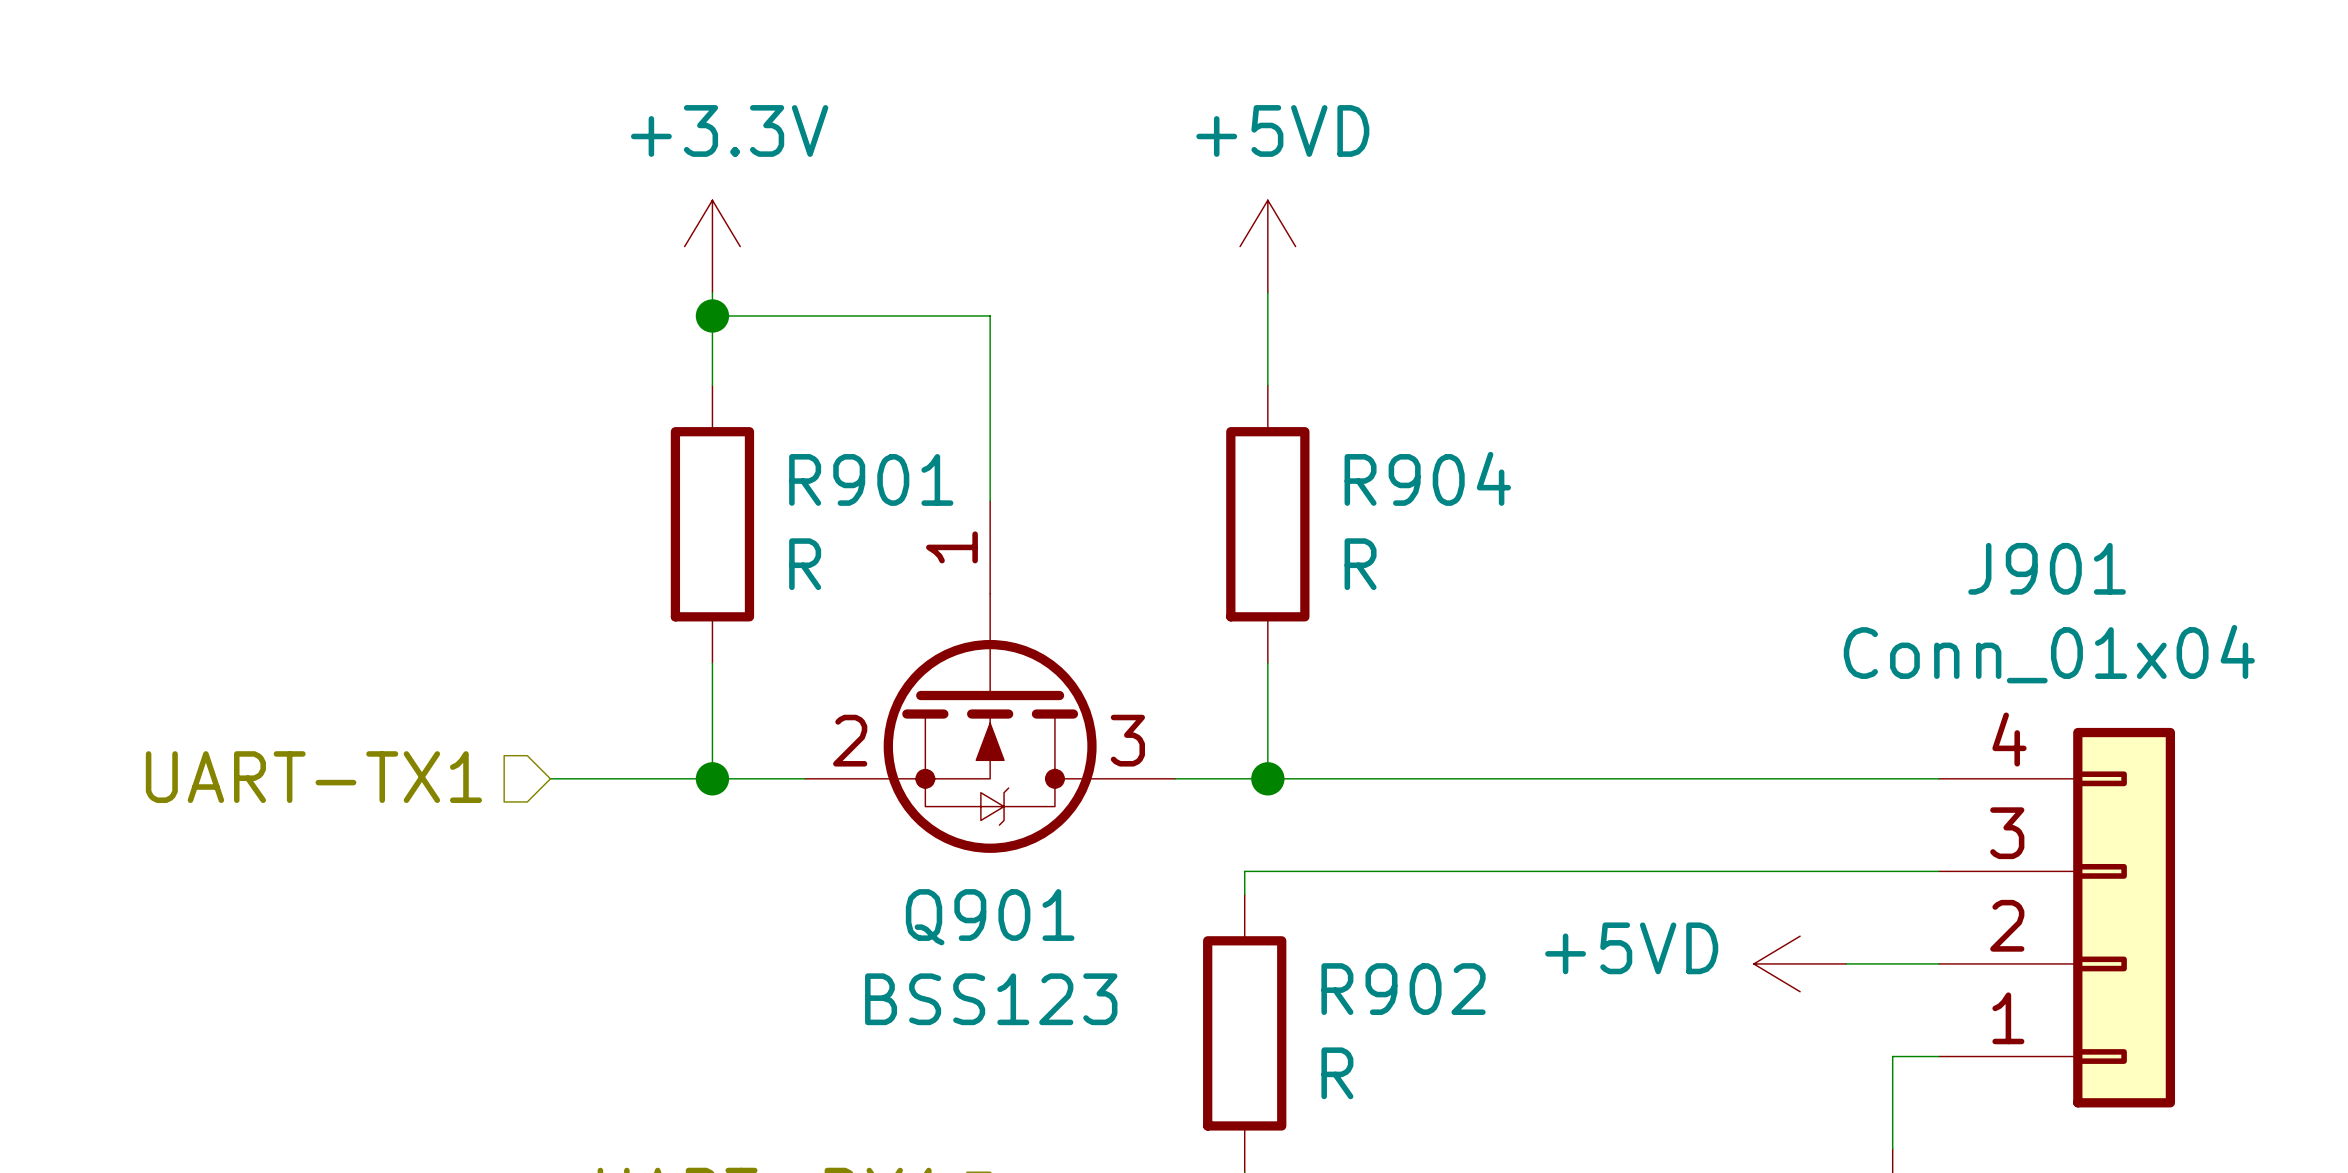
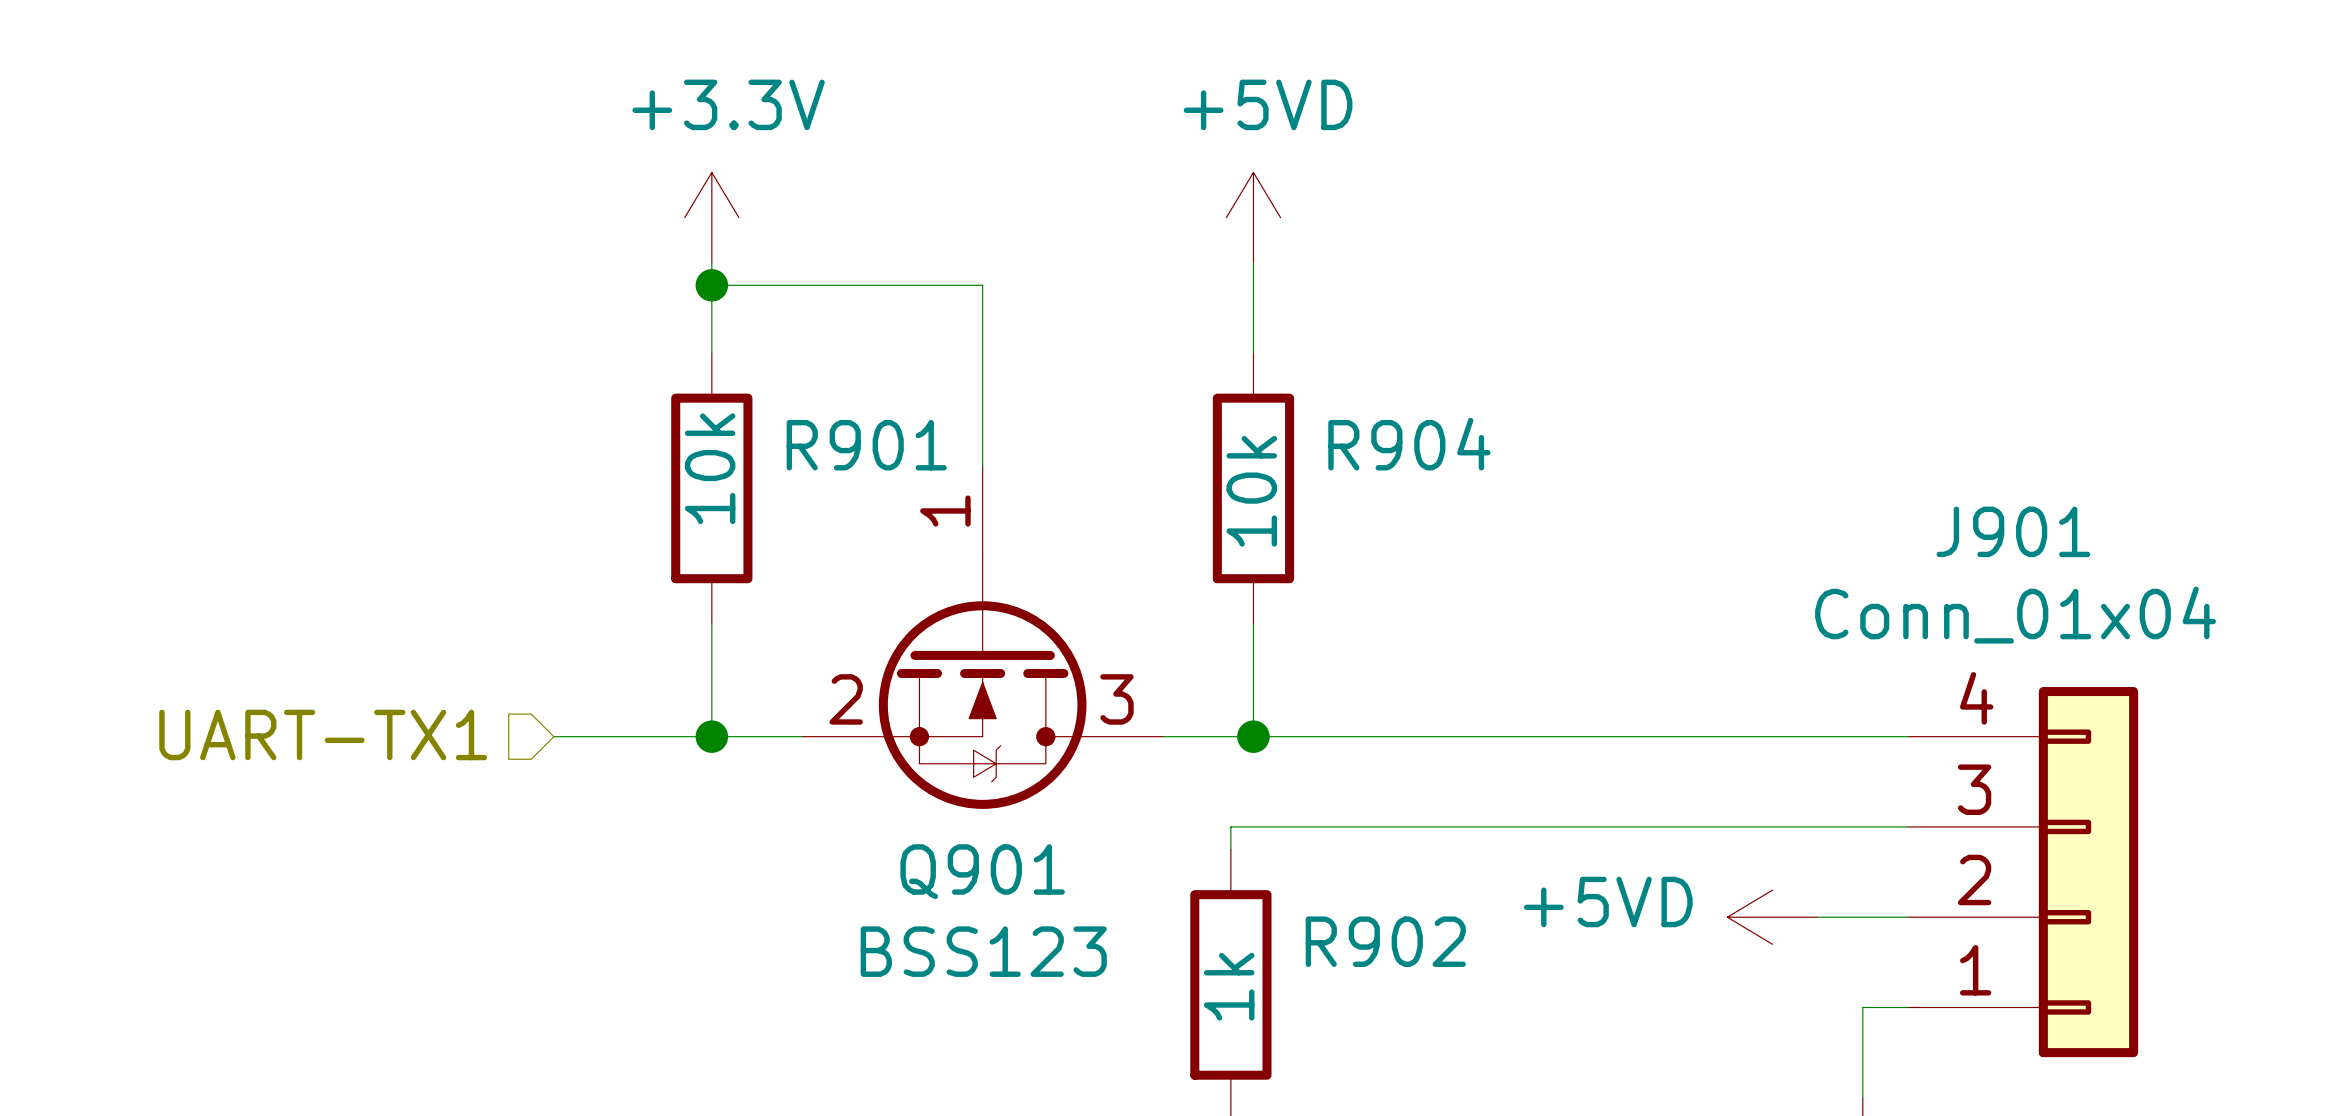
R901 value: R (805, 564) -> 10k (710, 468)
R904 value: R (1360, 564) -> 10k (1251, 491)
R902 value: R (1337, 1073) -> 1k (1229, 986)

